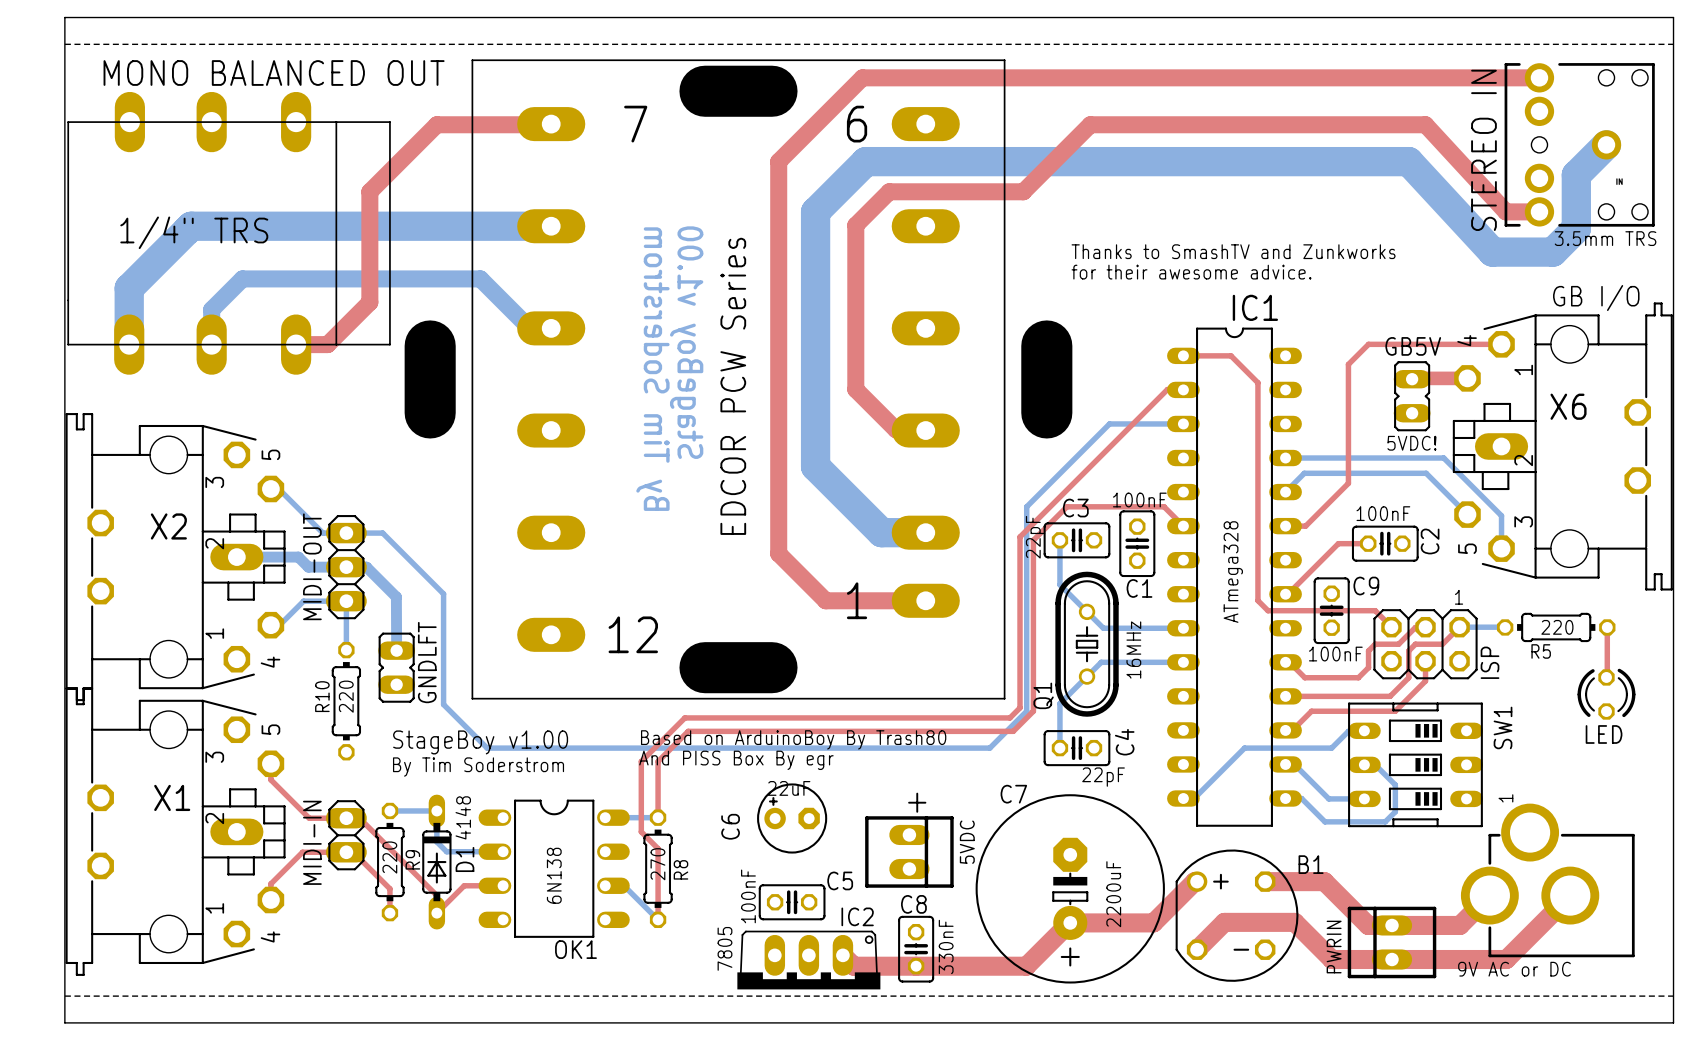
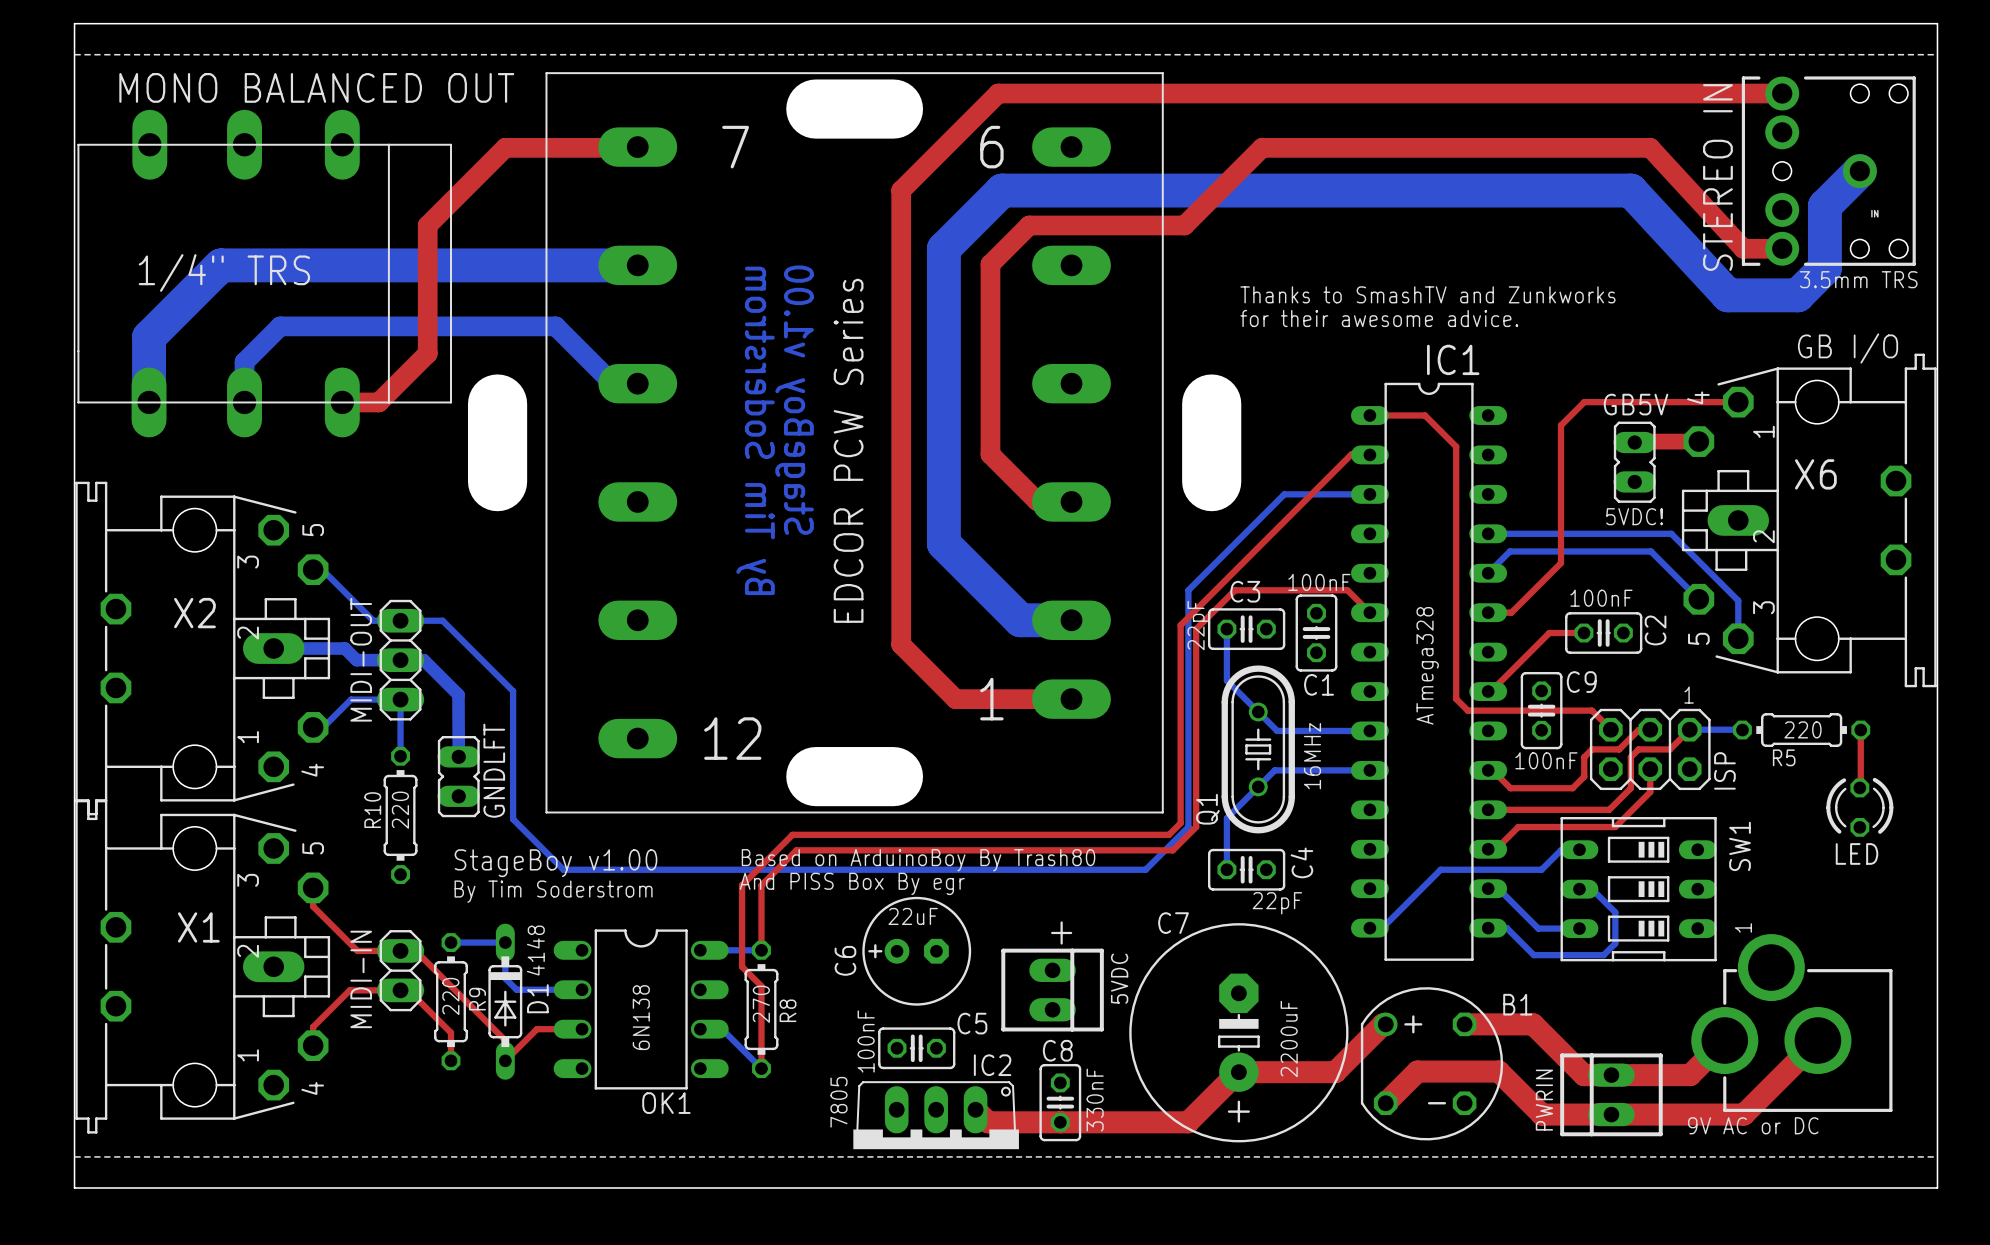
C6 footprint: [757, 783, 828, 854] -> [862, 896, 972, 1006]

